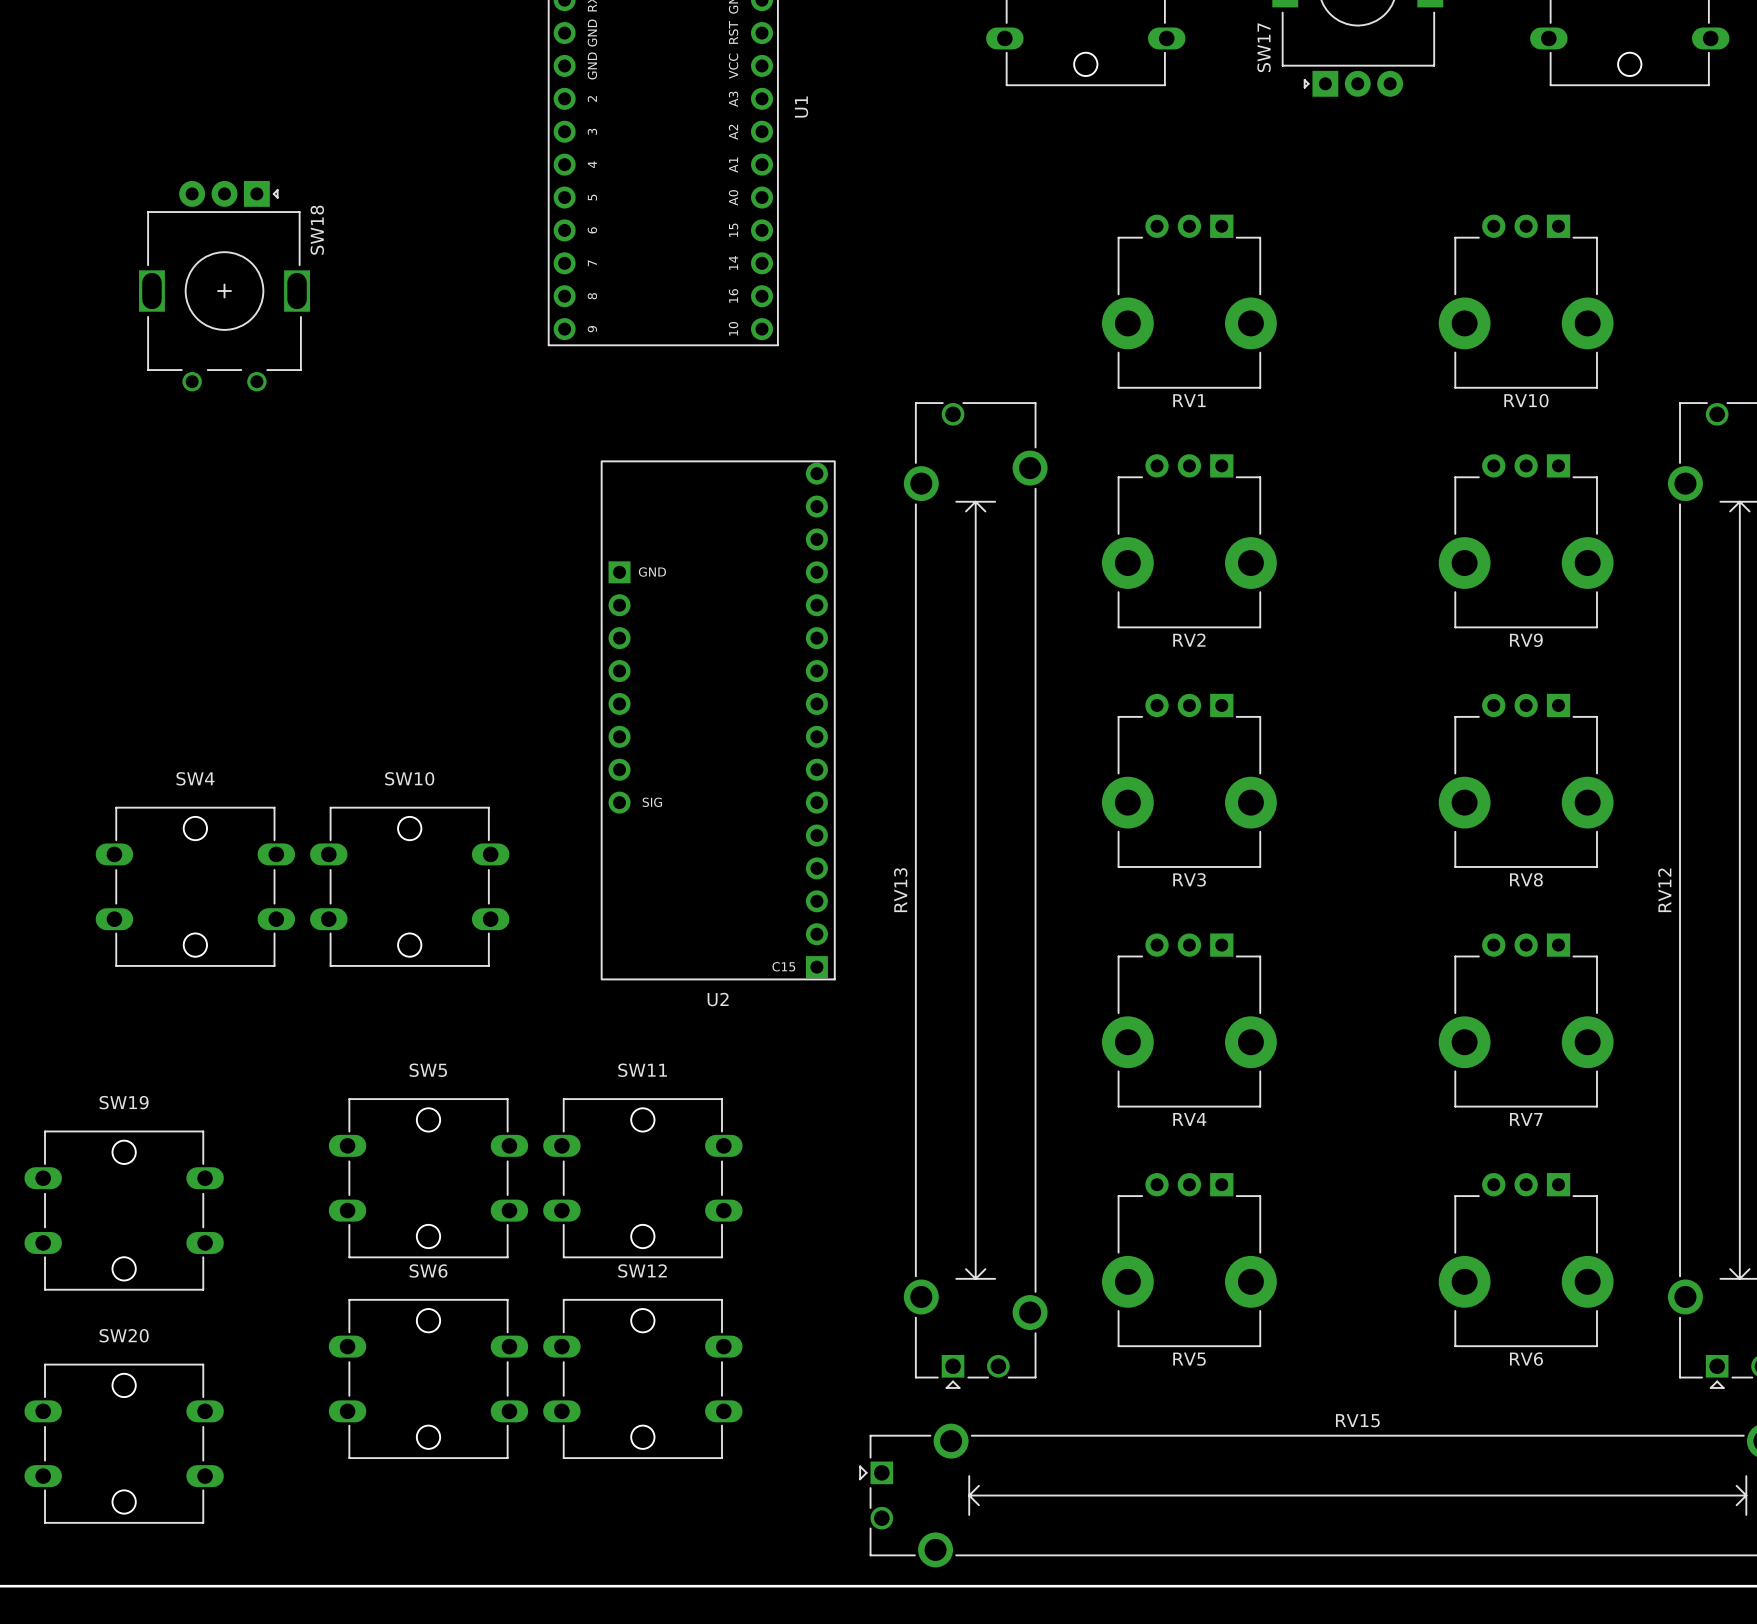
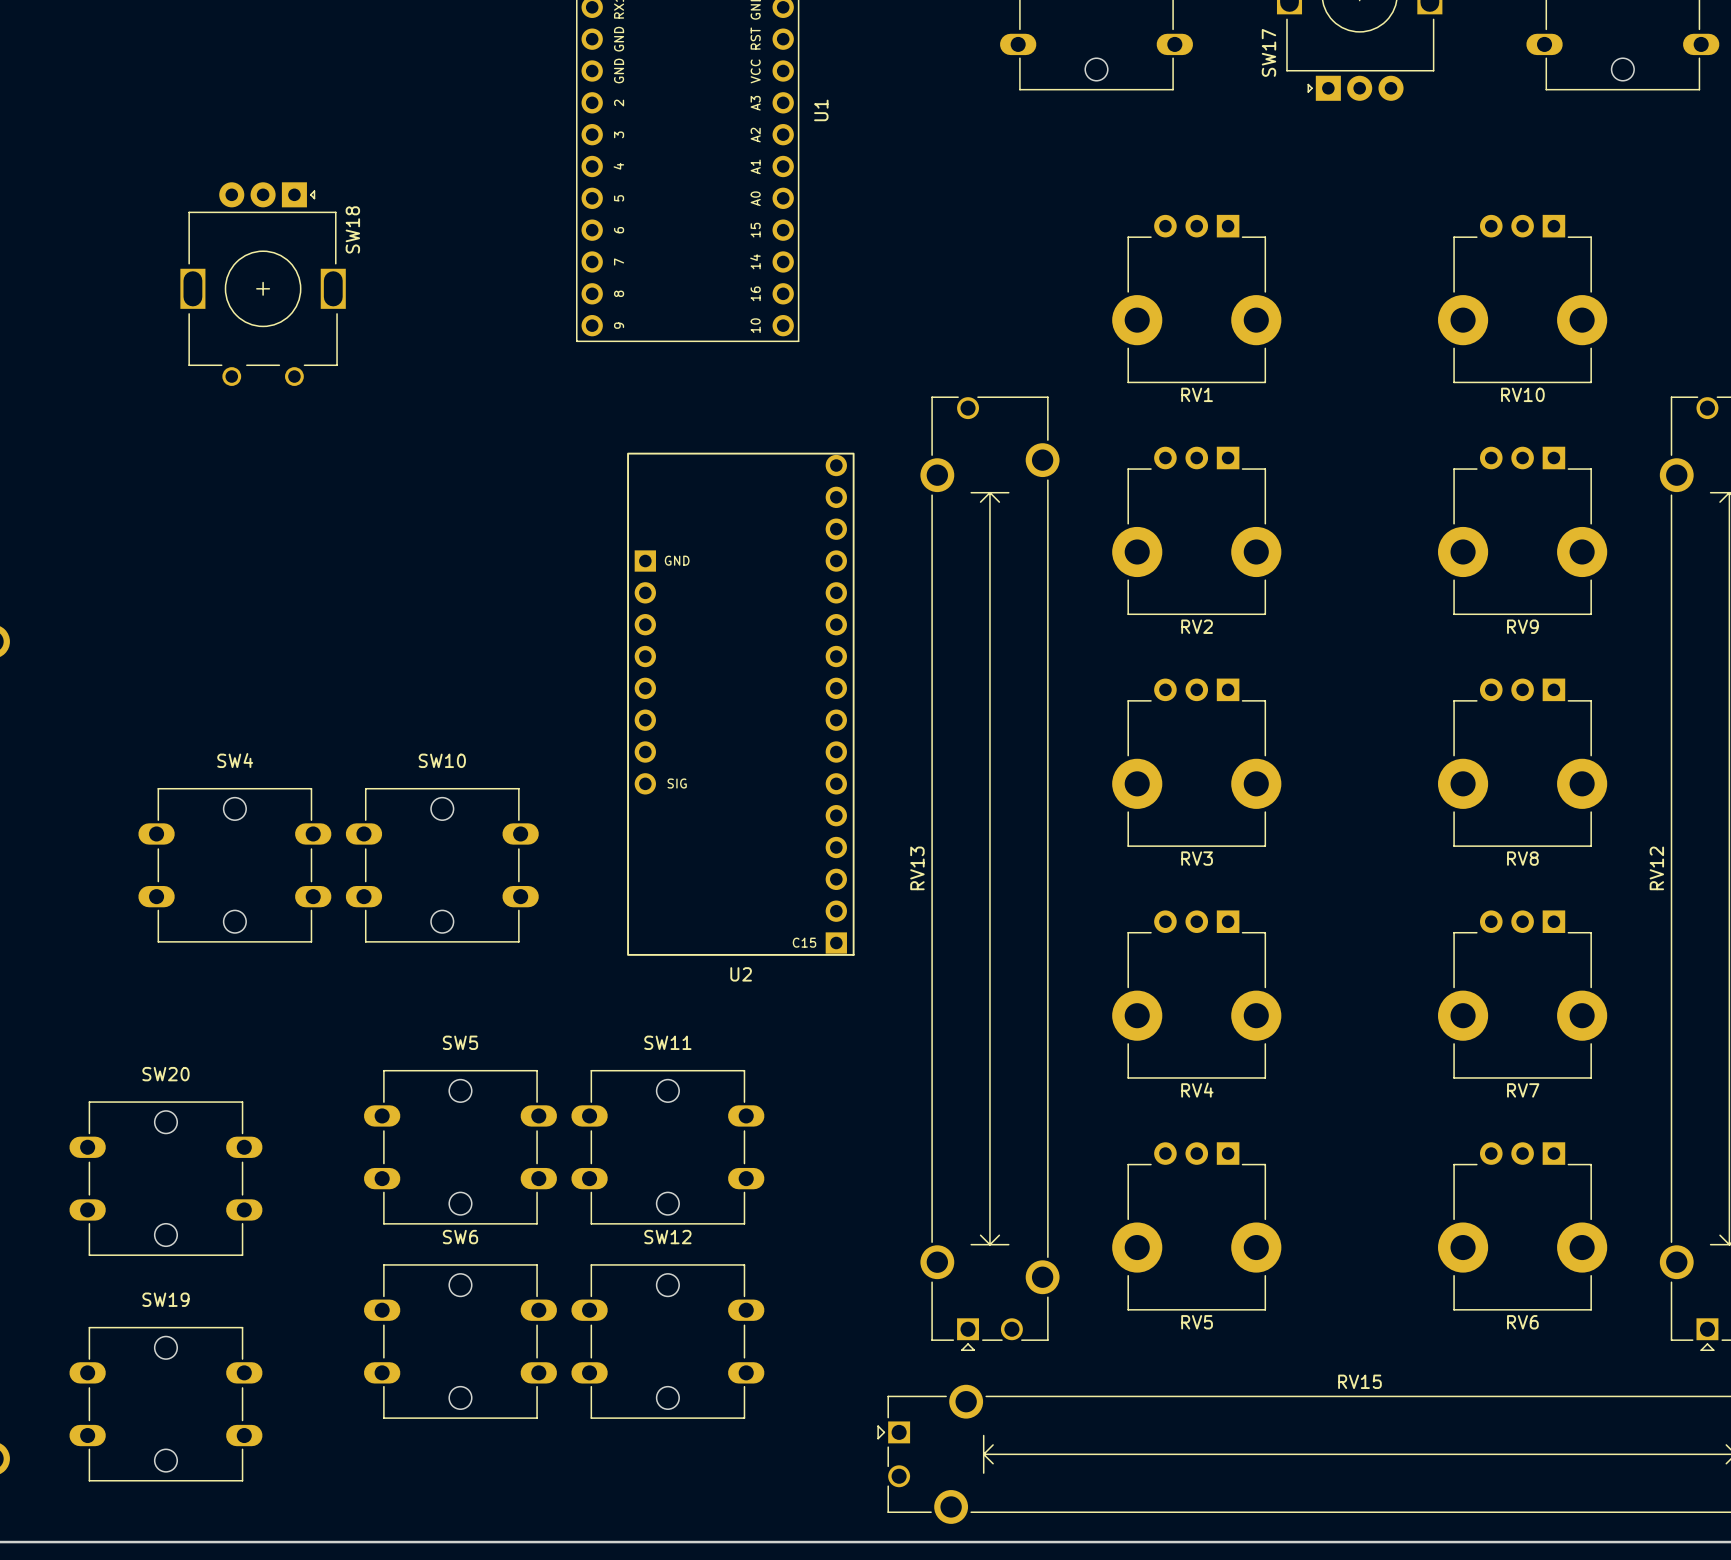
SW19 name: SW19 (124, 1102) -> SW20 (165, 1074)
SW20 name: SW20 (124, 1335) -> SW19 (165, 1299)

